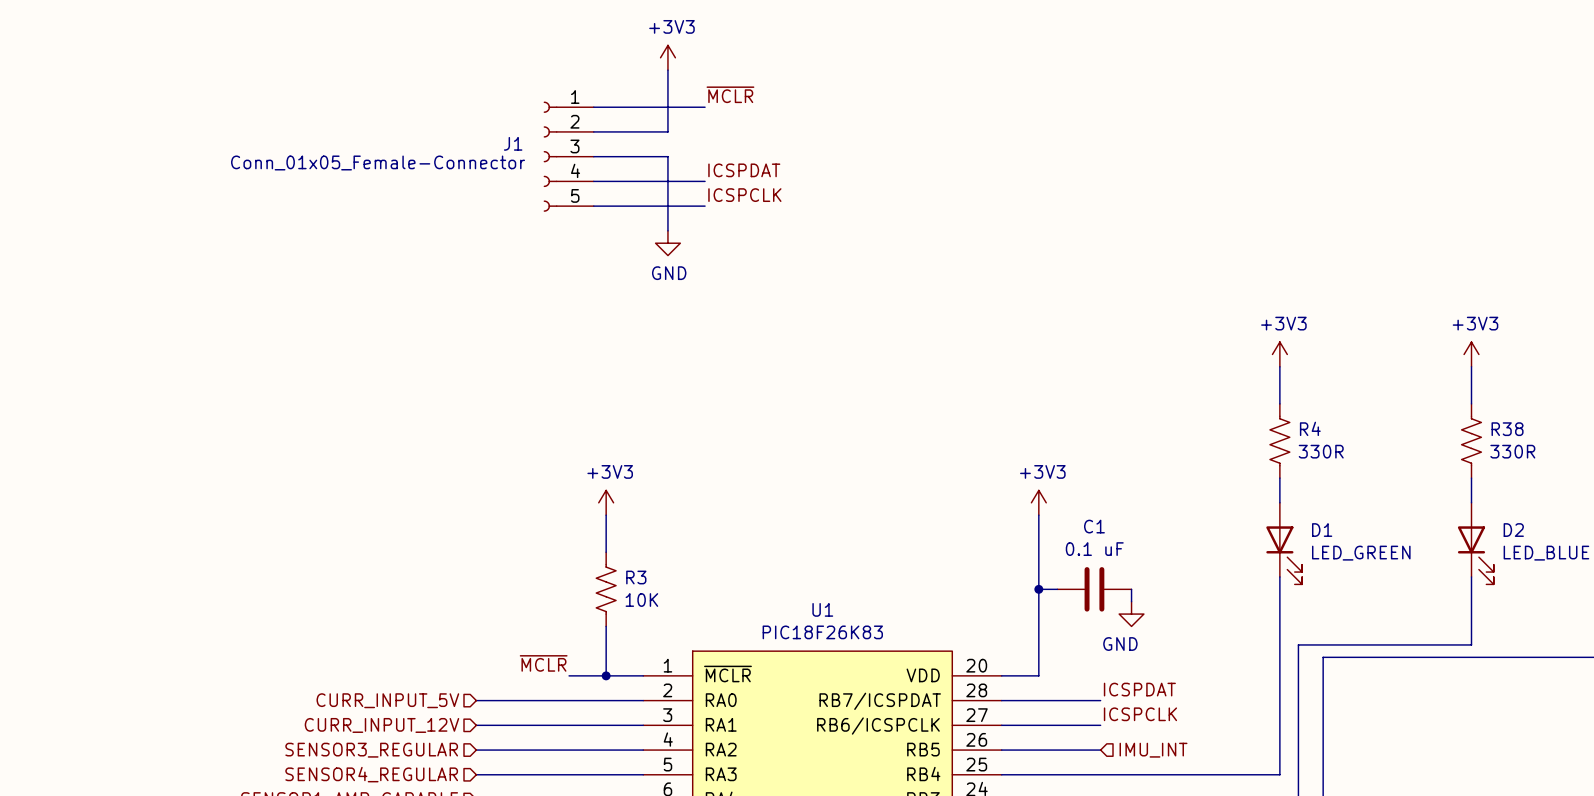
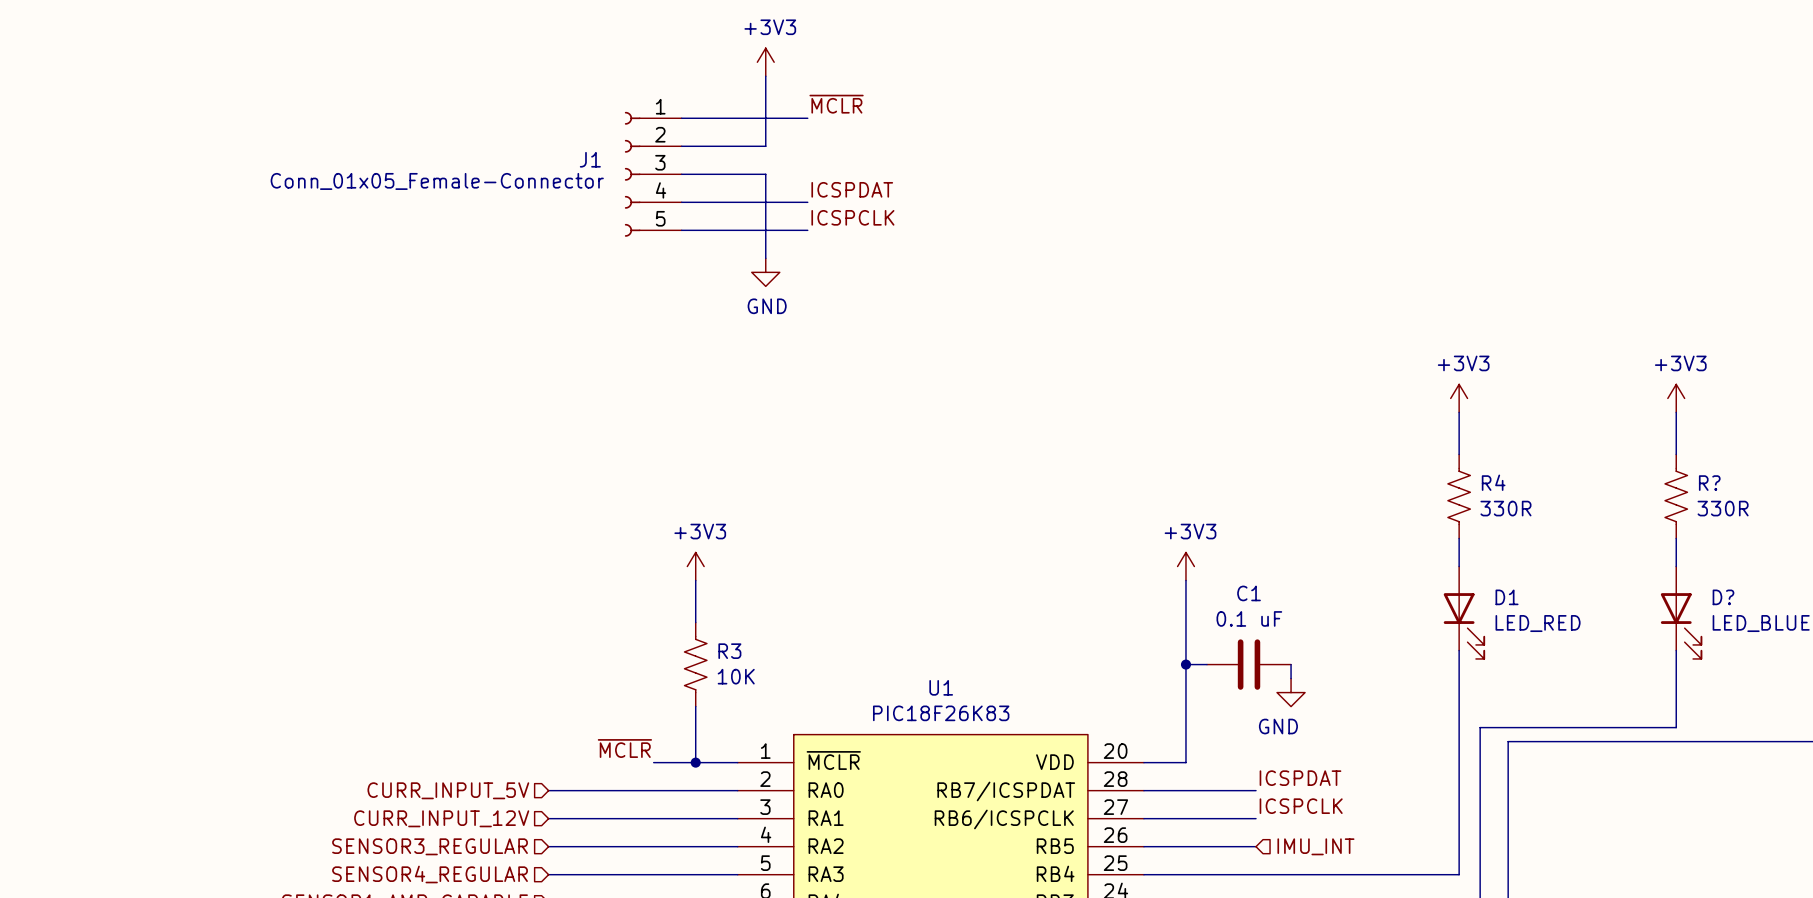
R38 name: R38 (1507, 429) -> R? (1709, 483)
D2 name: D2 (1513, 530) -> D? (1723, 597)
D1 value: LED_GREEN (1361, 553) -> LED_RED (1538, 623)

